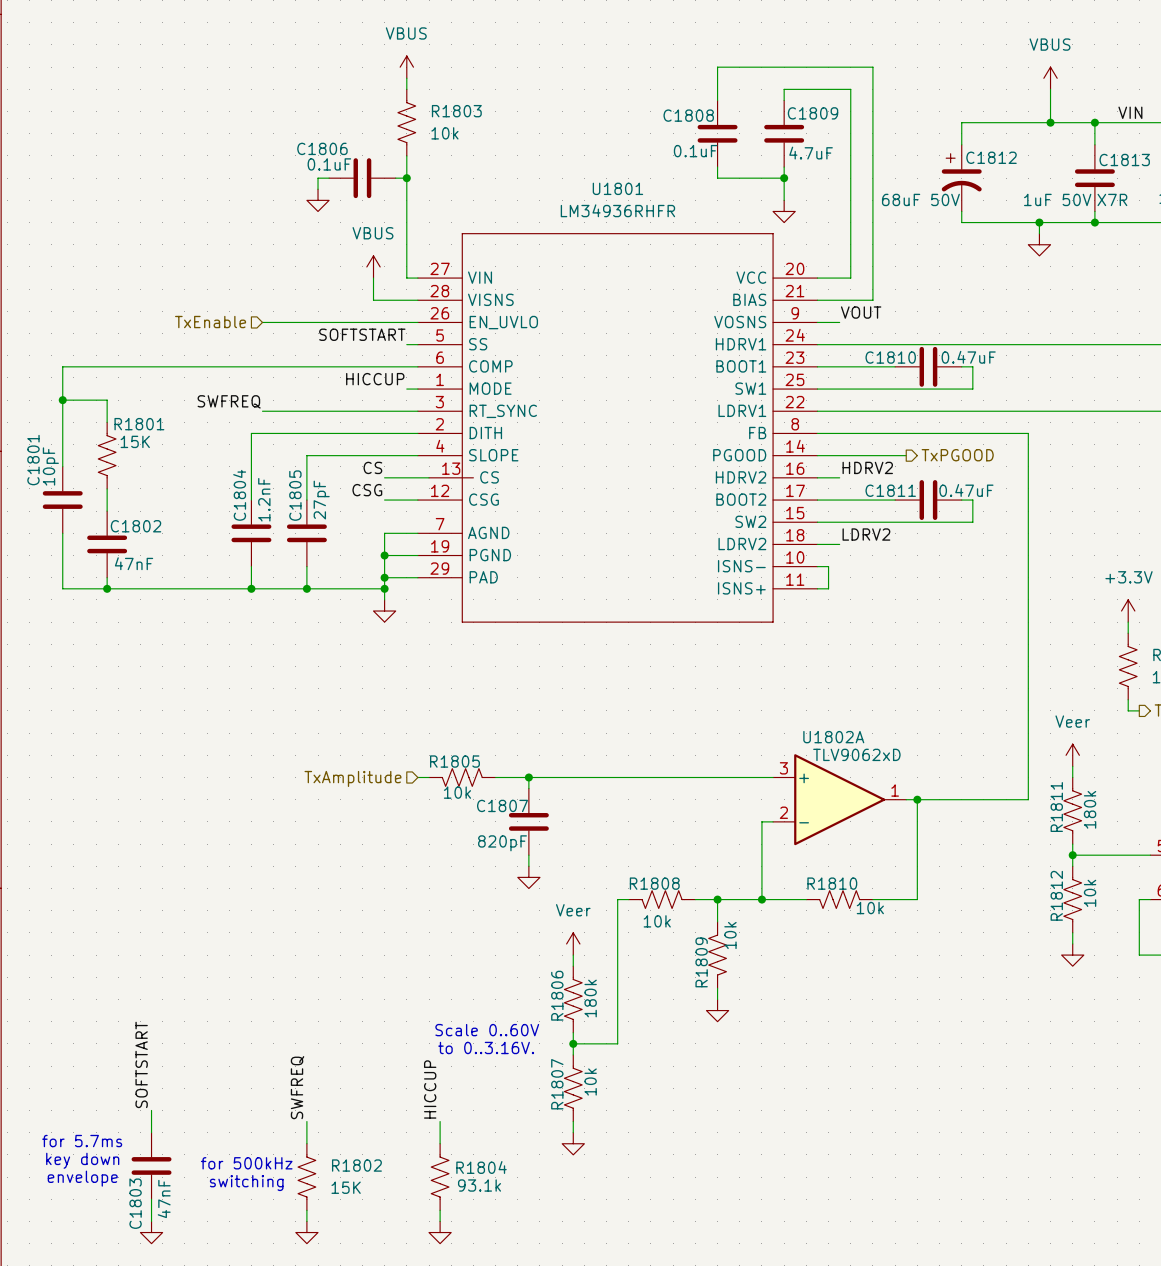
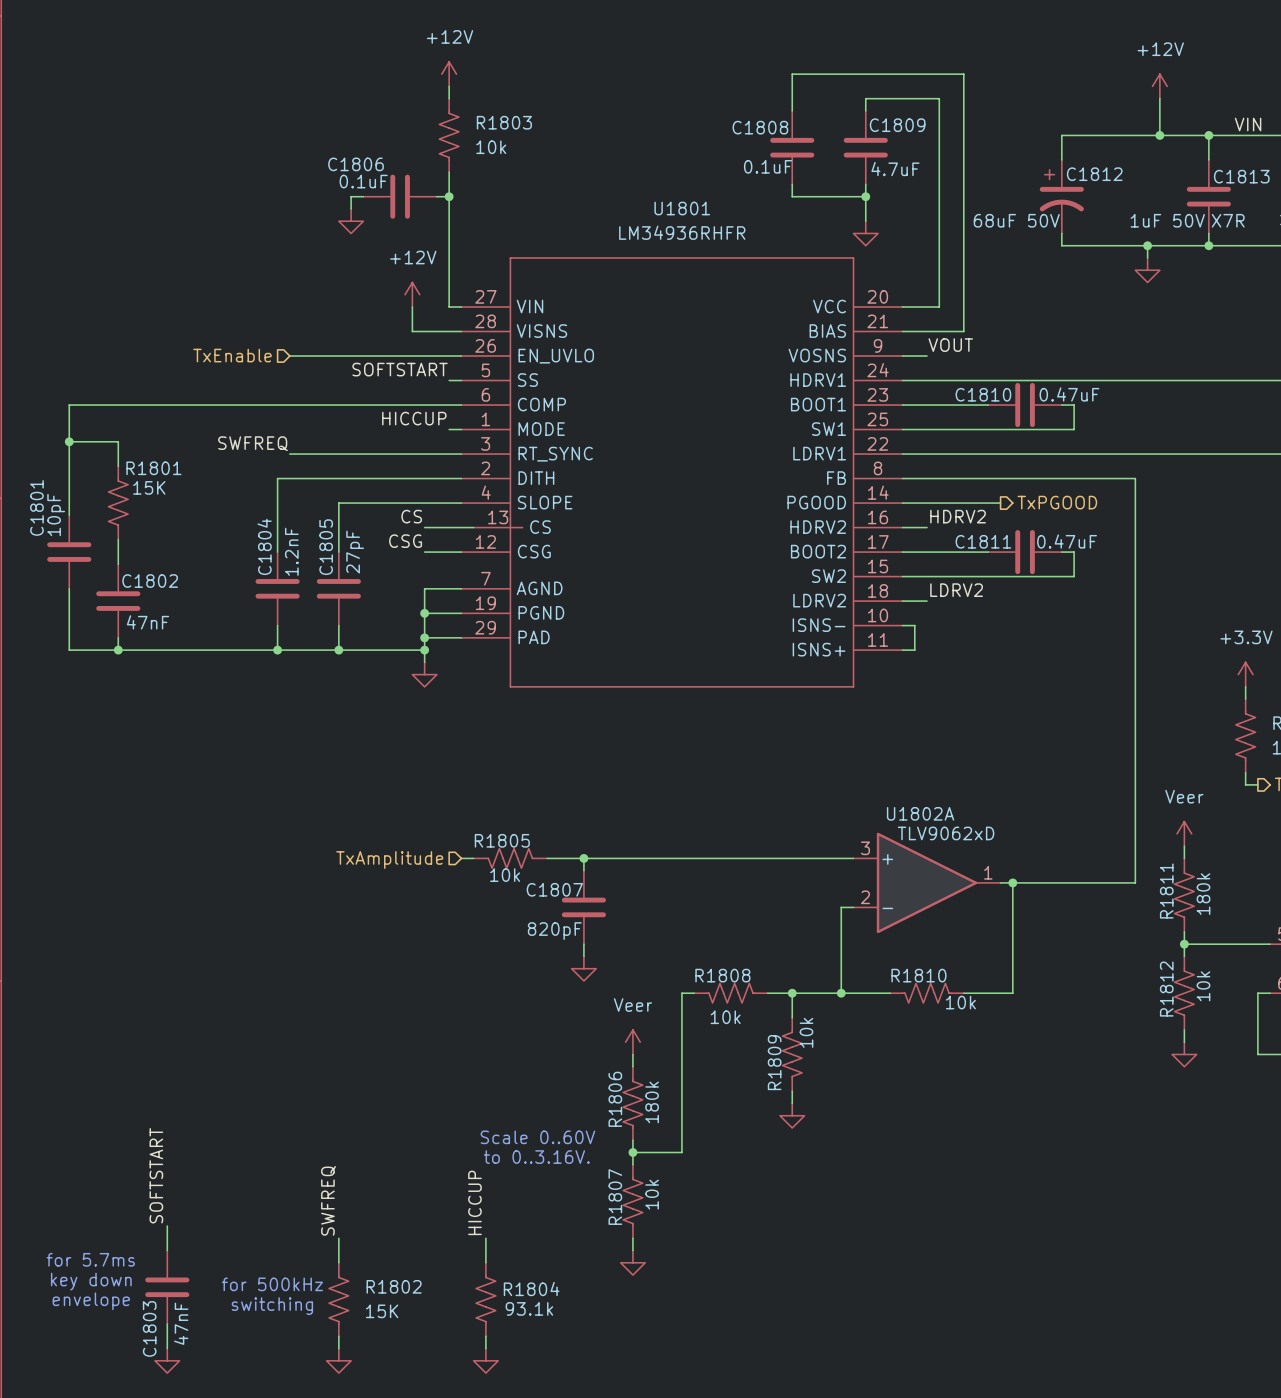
power symbol: VBUS (406, 67) -> +12V (449, 74)
power symbol: VBUS (1050, 78) -> +12V (1159, 86)
power symbol: VBUS (373, 266) -> +12V (412, 294)

